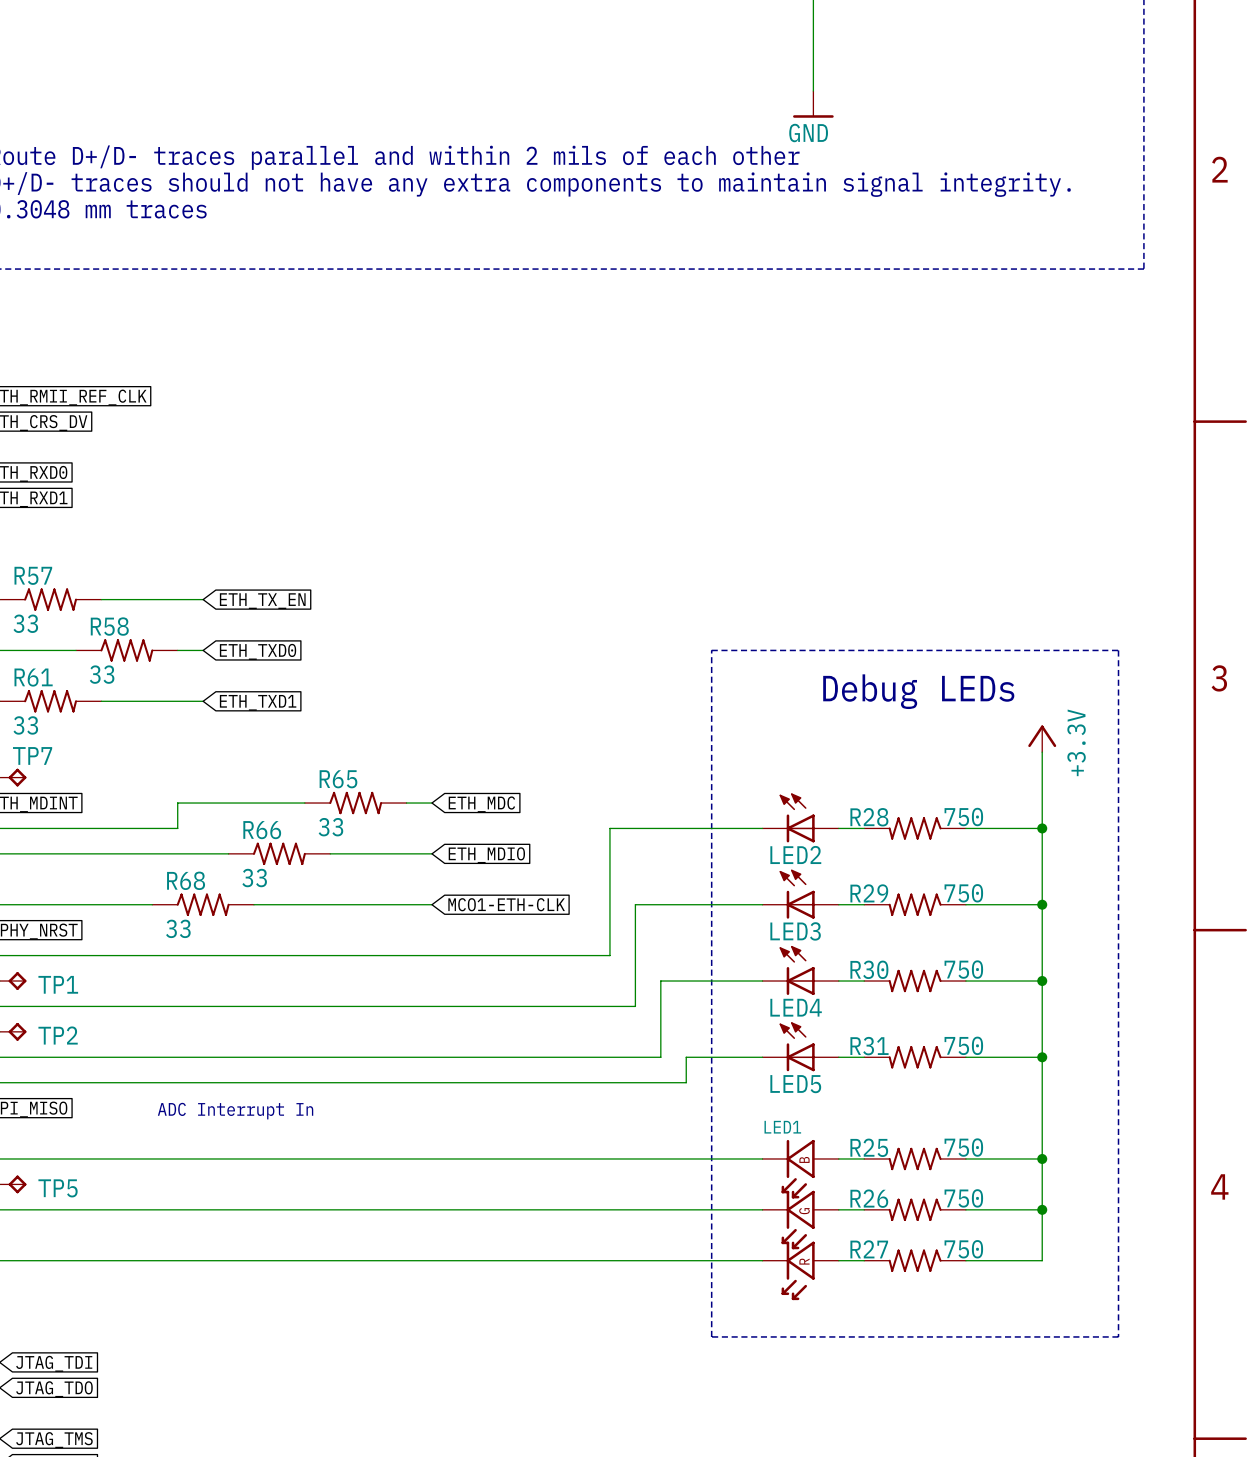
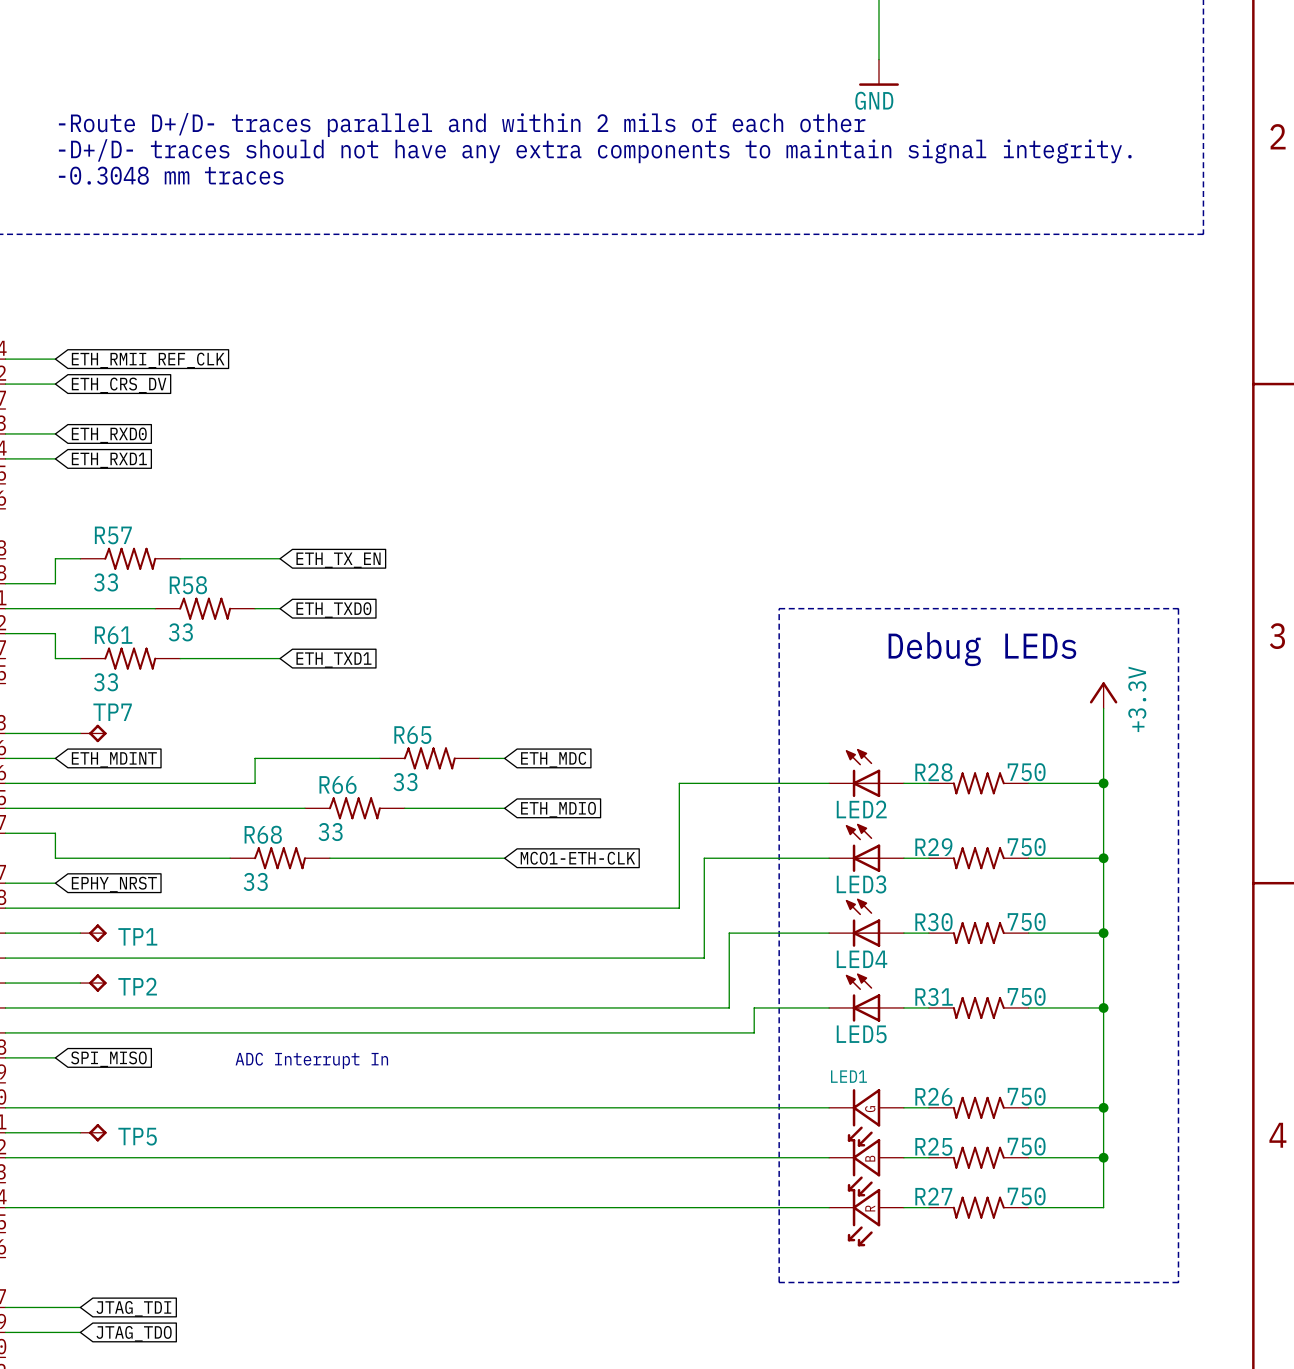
R25 name: R25 (869, 1147) -> R26 (933, 1096)
part text: B (804, 1159) -> G (870, 1109)
R26 name: R26 (869, 1198) -> R25 (933, 1146)
part text: G (804, 1211) -> B (870, 1158)

